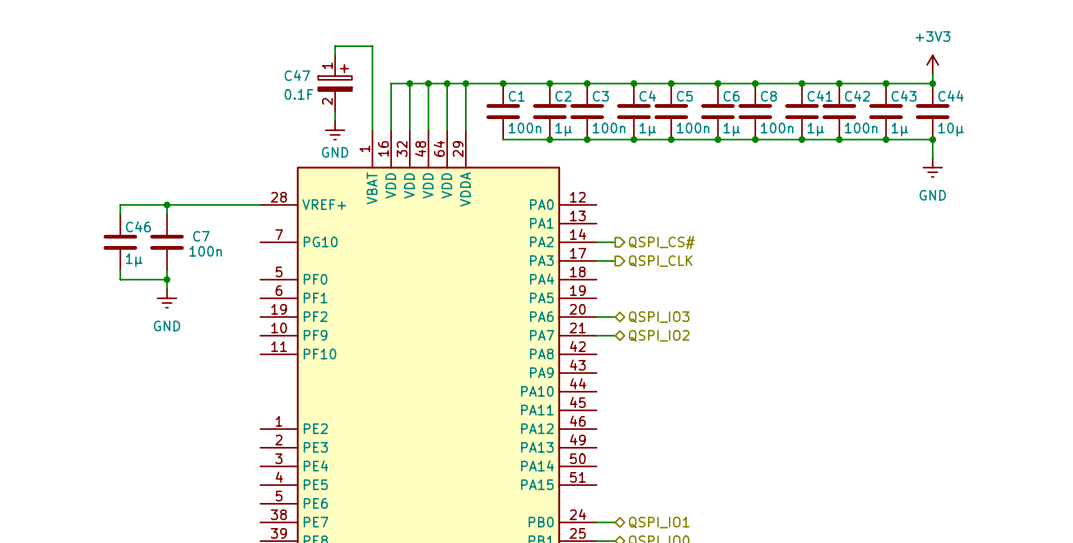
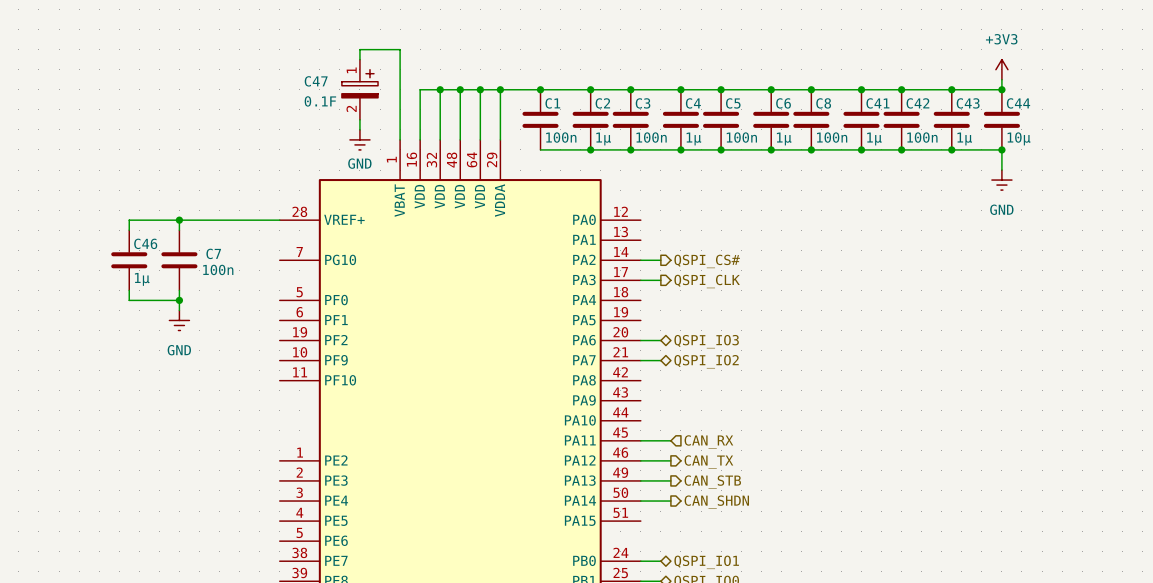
wire: none -> (640, 440) (670, 440)
hierarchical label: none -> CAN_RX (708, 441)
wire: none -> (640, 460) (670, 460)
hierarchical label: none -> CAN_TX (708, 462)
wire: none -> (640, 480) (670, 480)
hierarchical label: none -> CAN_STB (712, 482)
wire: none -> (640, 501) (670, 501)
hierarchical label: none -> CAN_SHDN (716, 502)

